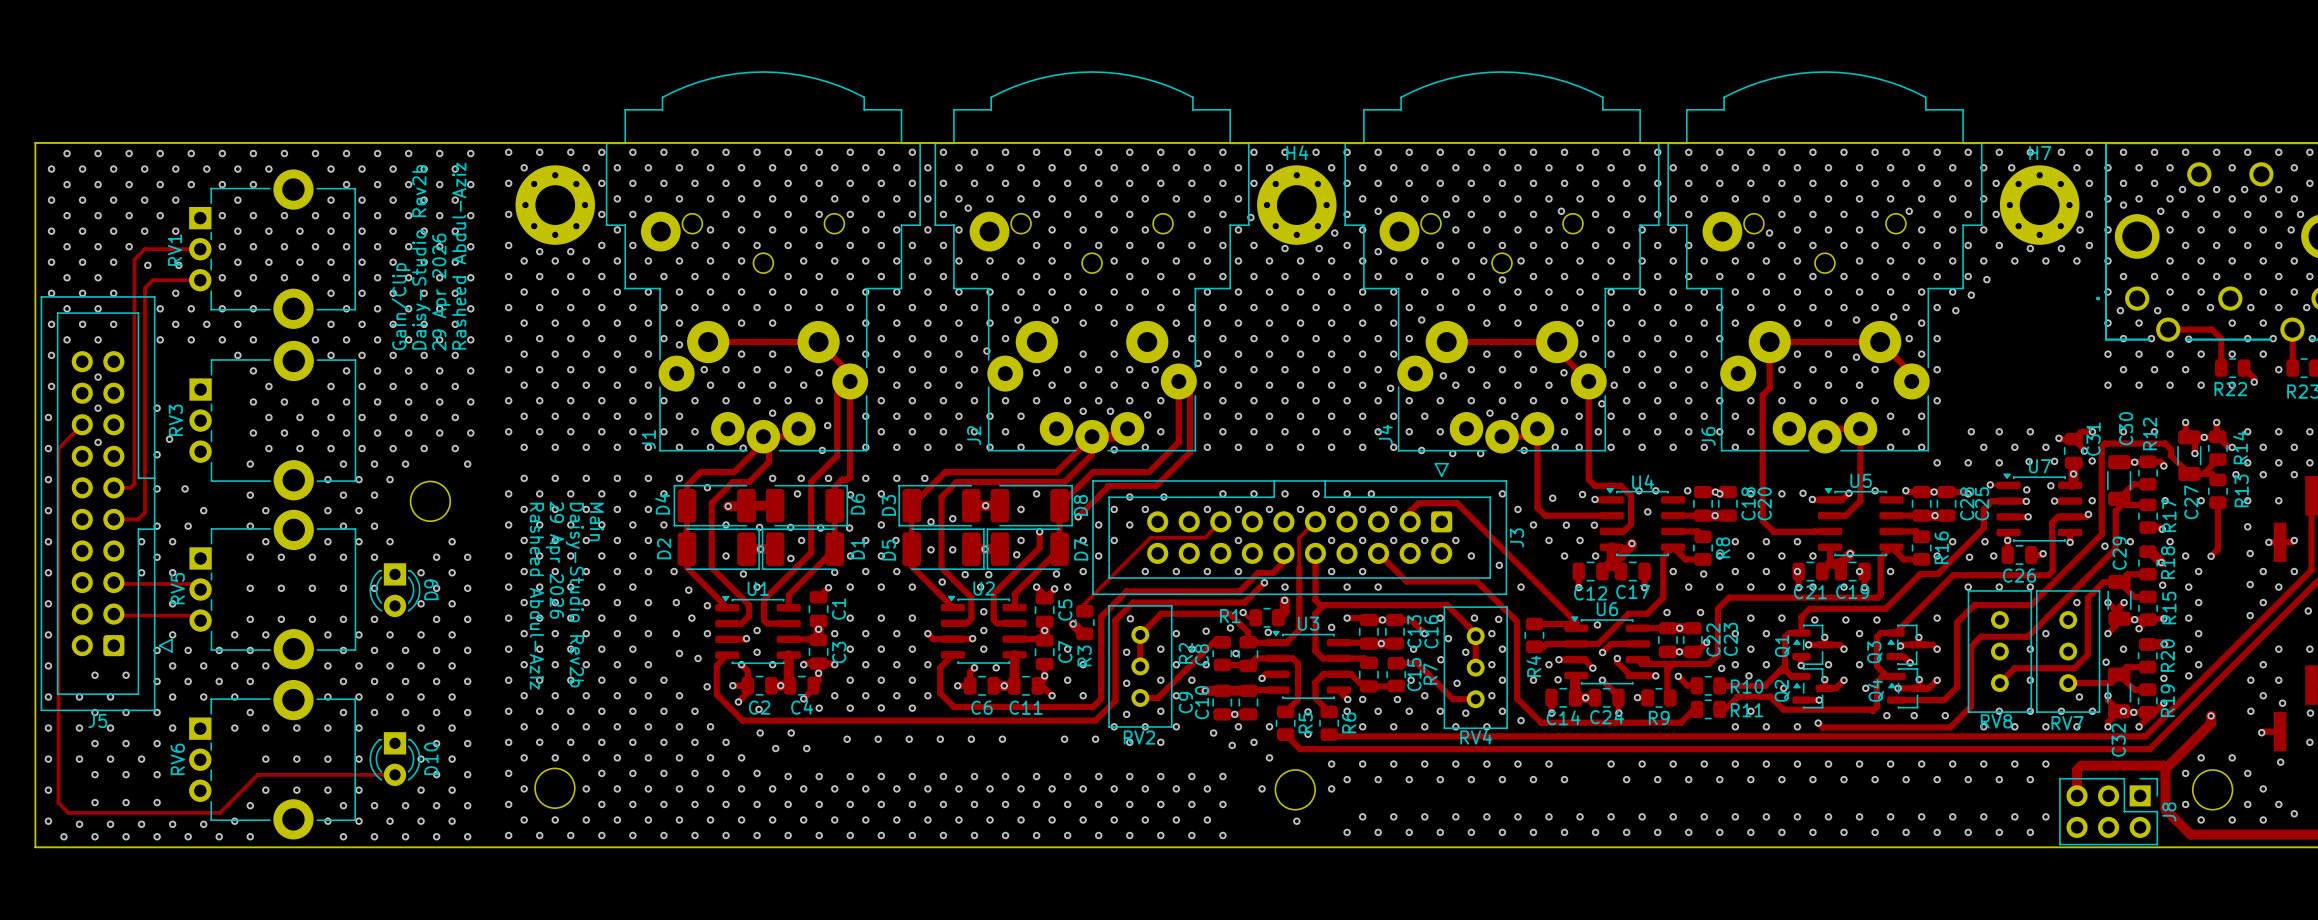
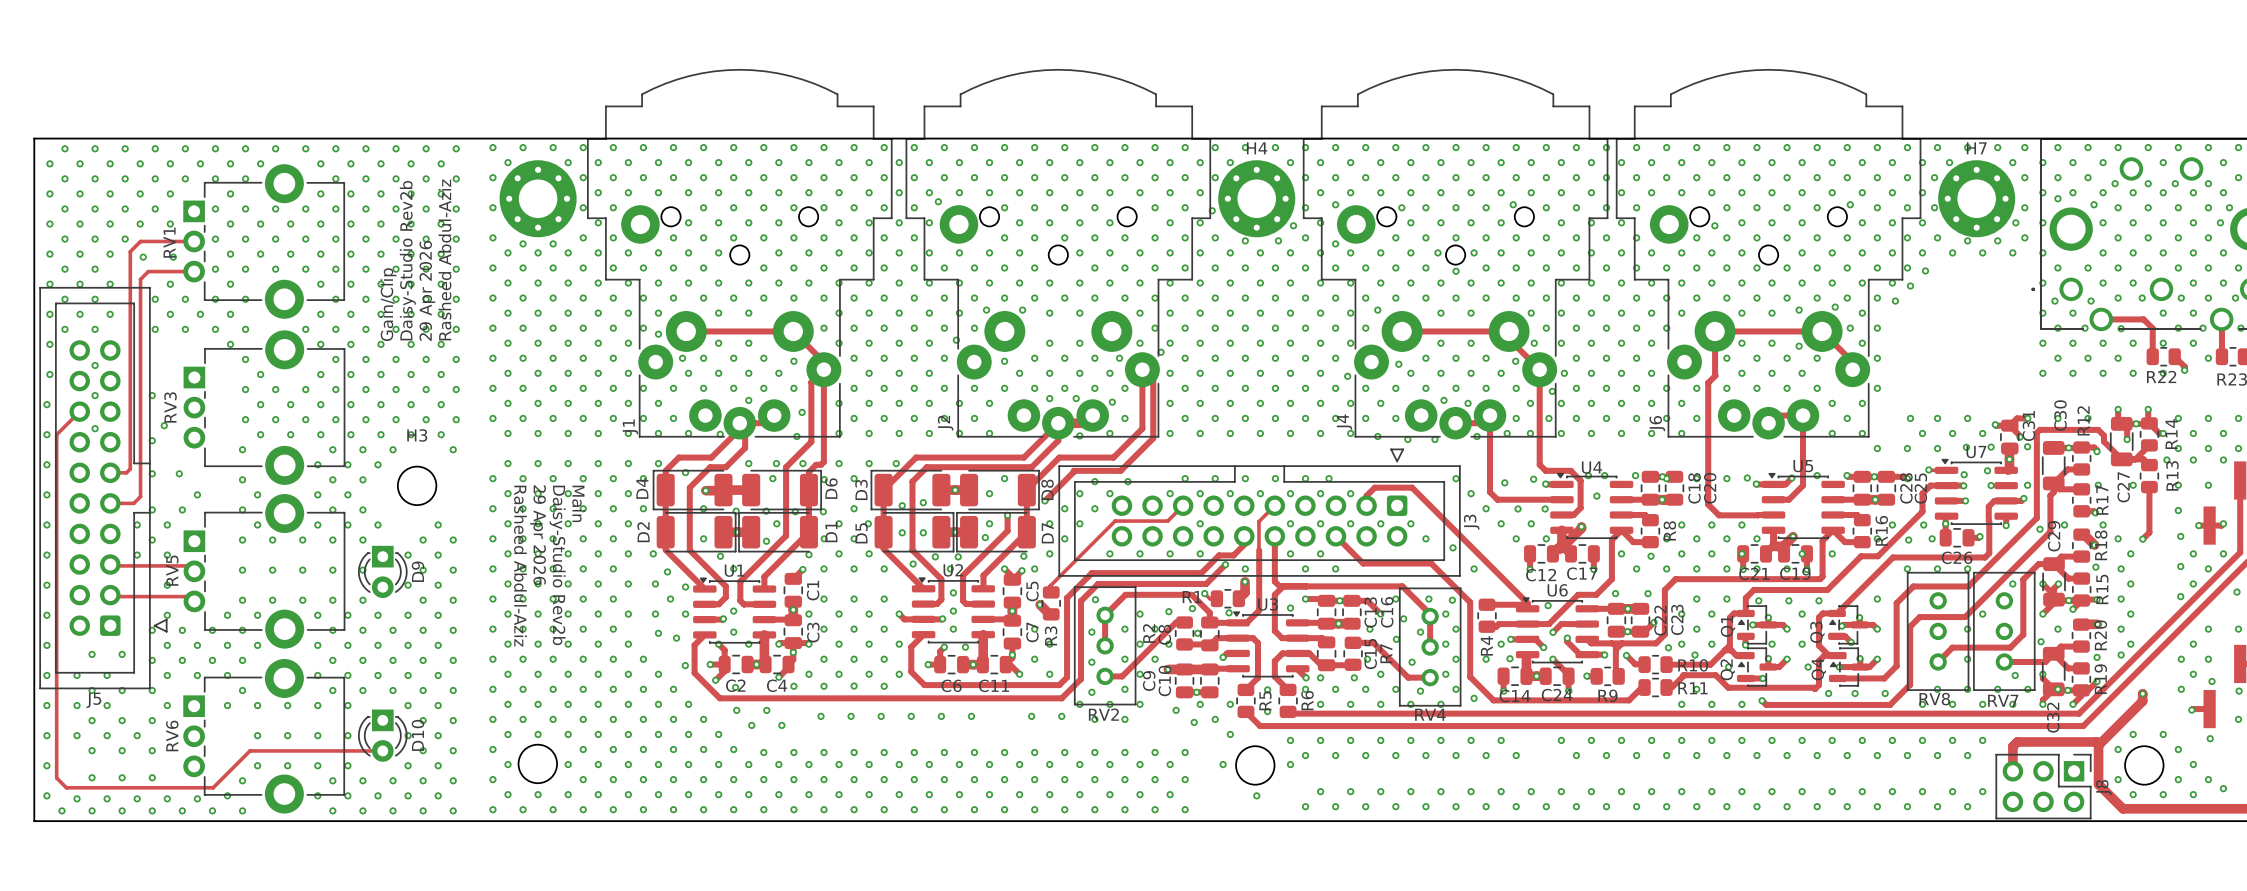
H3 name: none -> H3 (417, 435)

